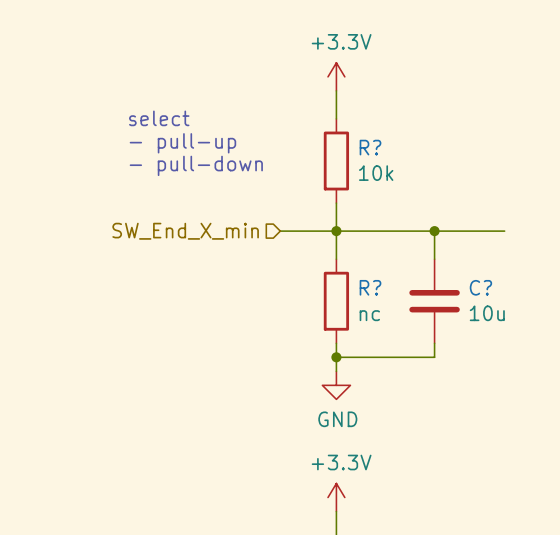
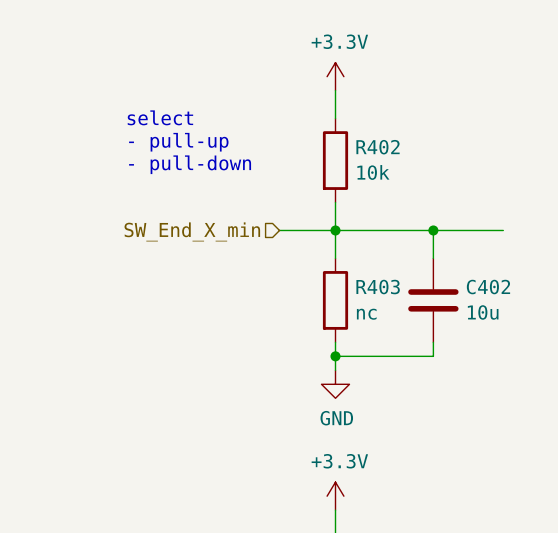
R? name: R? (370, 147) -> R402 (378, 147)
R? name: R? (370, 287) -> R403 (378, 287)
C? name: C? (480, 287) -> C402 (488, 287)

